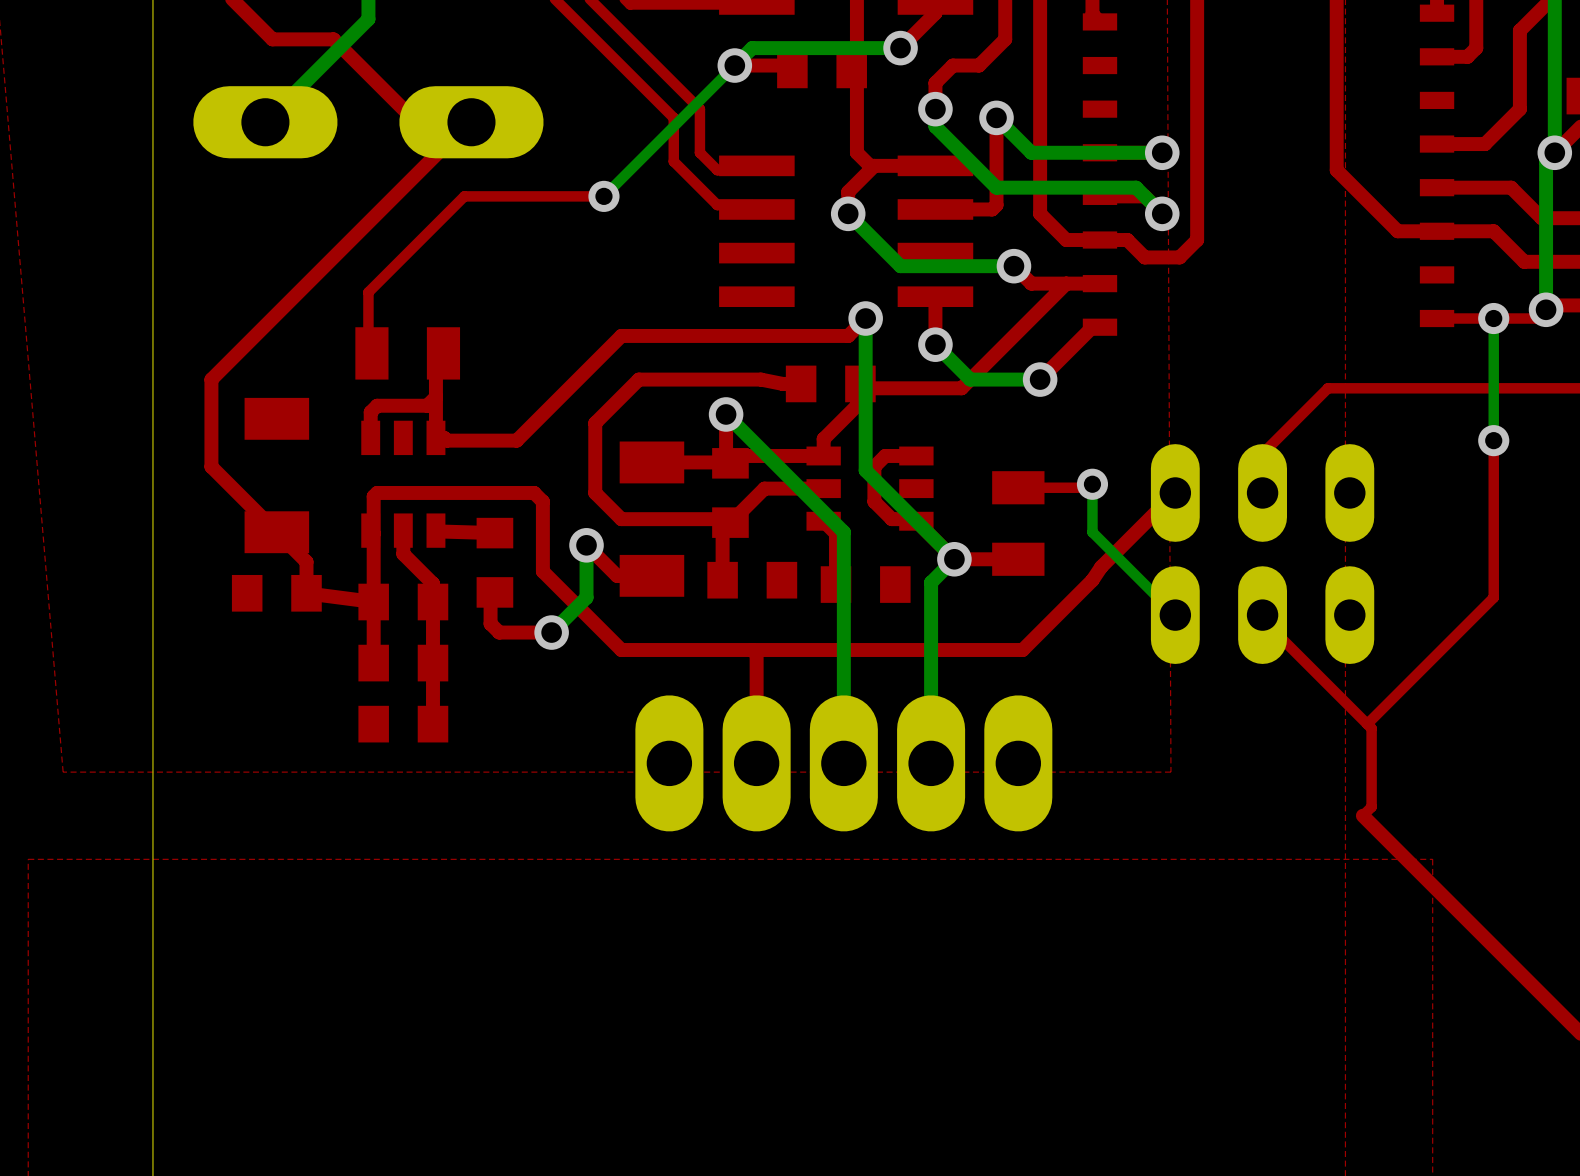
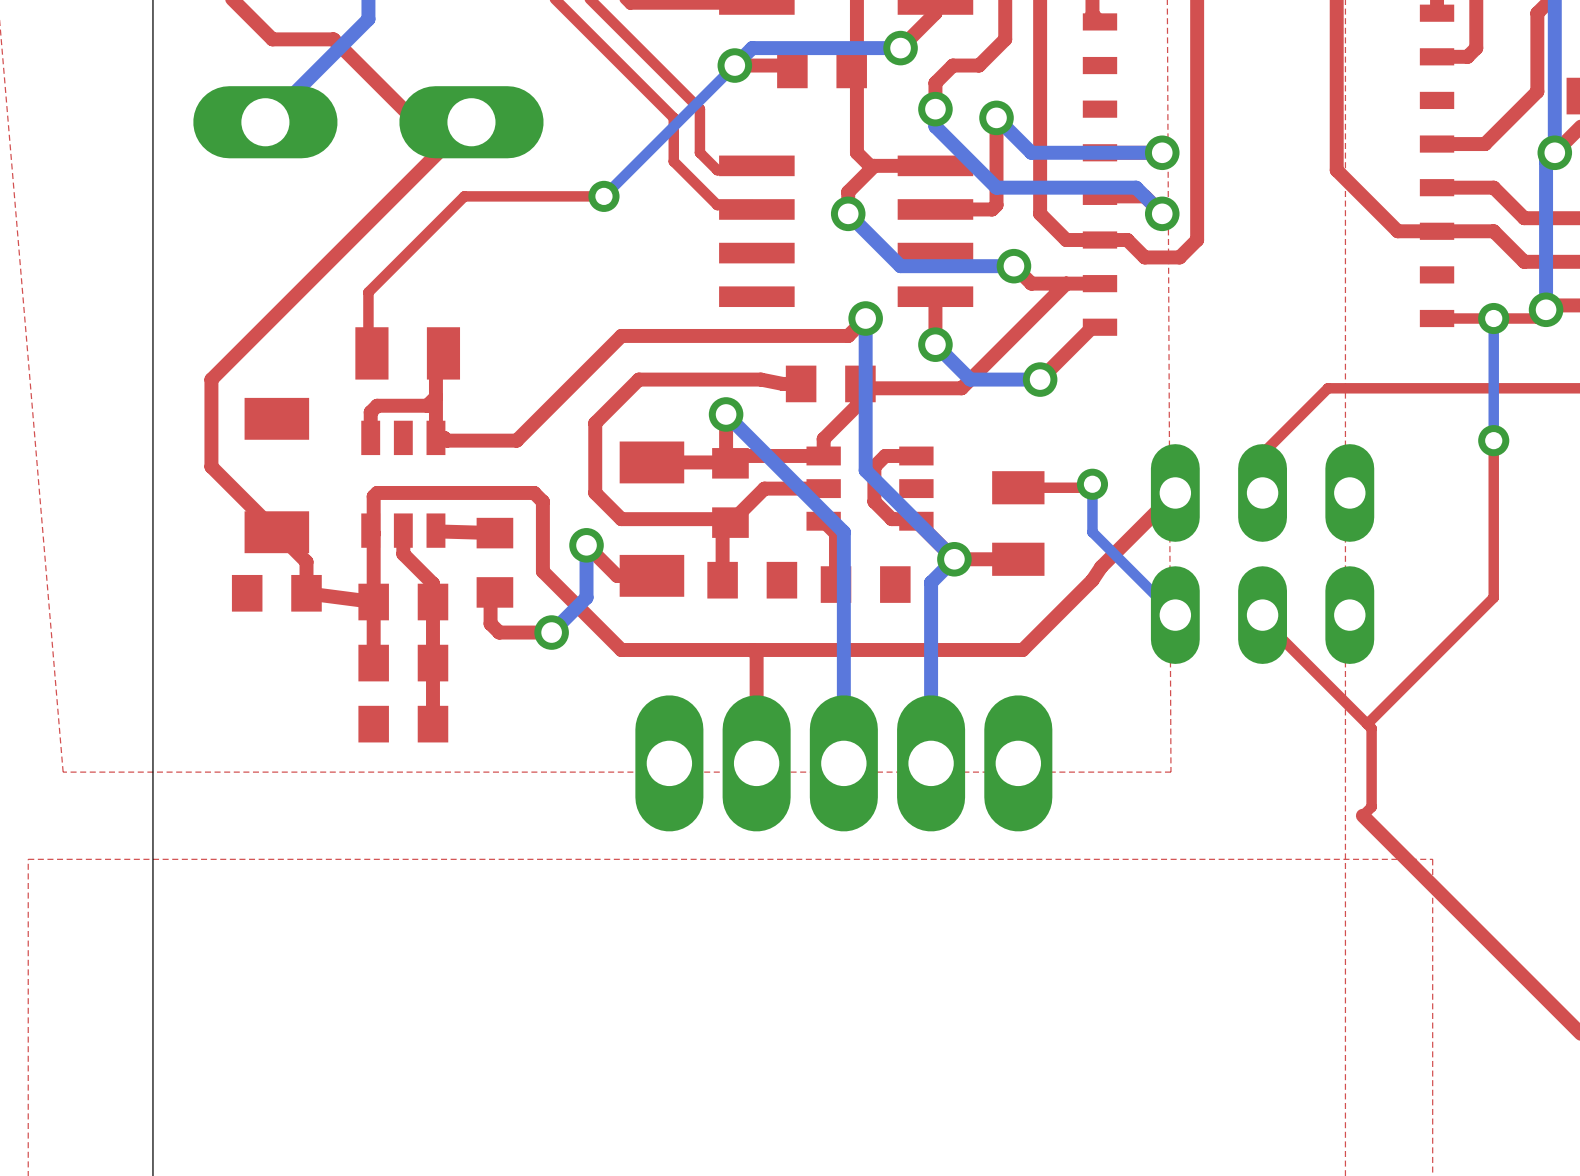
top track: (1537, 13) (1519, 30) (1519, 109) -> (1537, 13) (1537, 91) (1519, 109)
top track: (1493, 187) (1511, 187) (1541, 218) -> (1493, 187) (1524, 218) (1541, 218)

